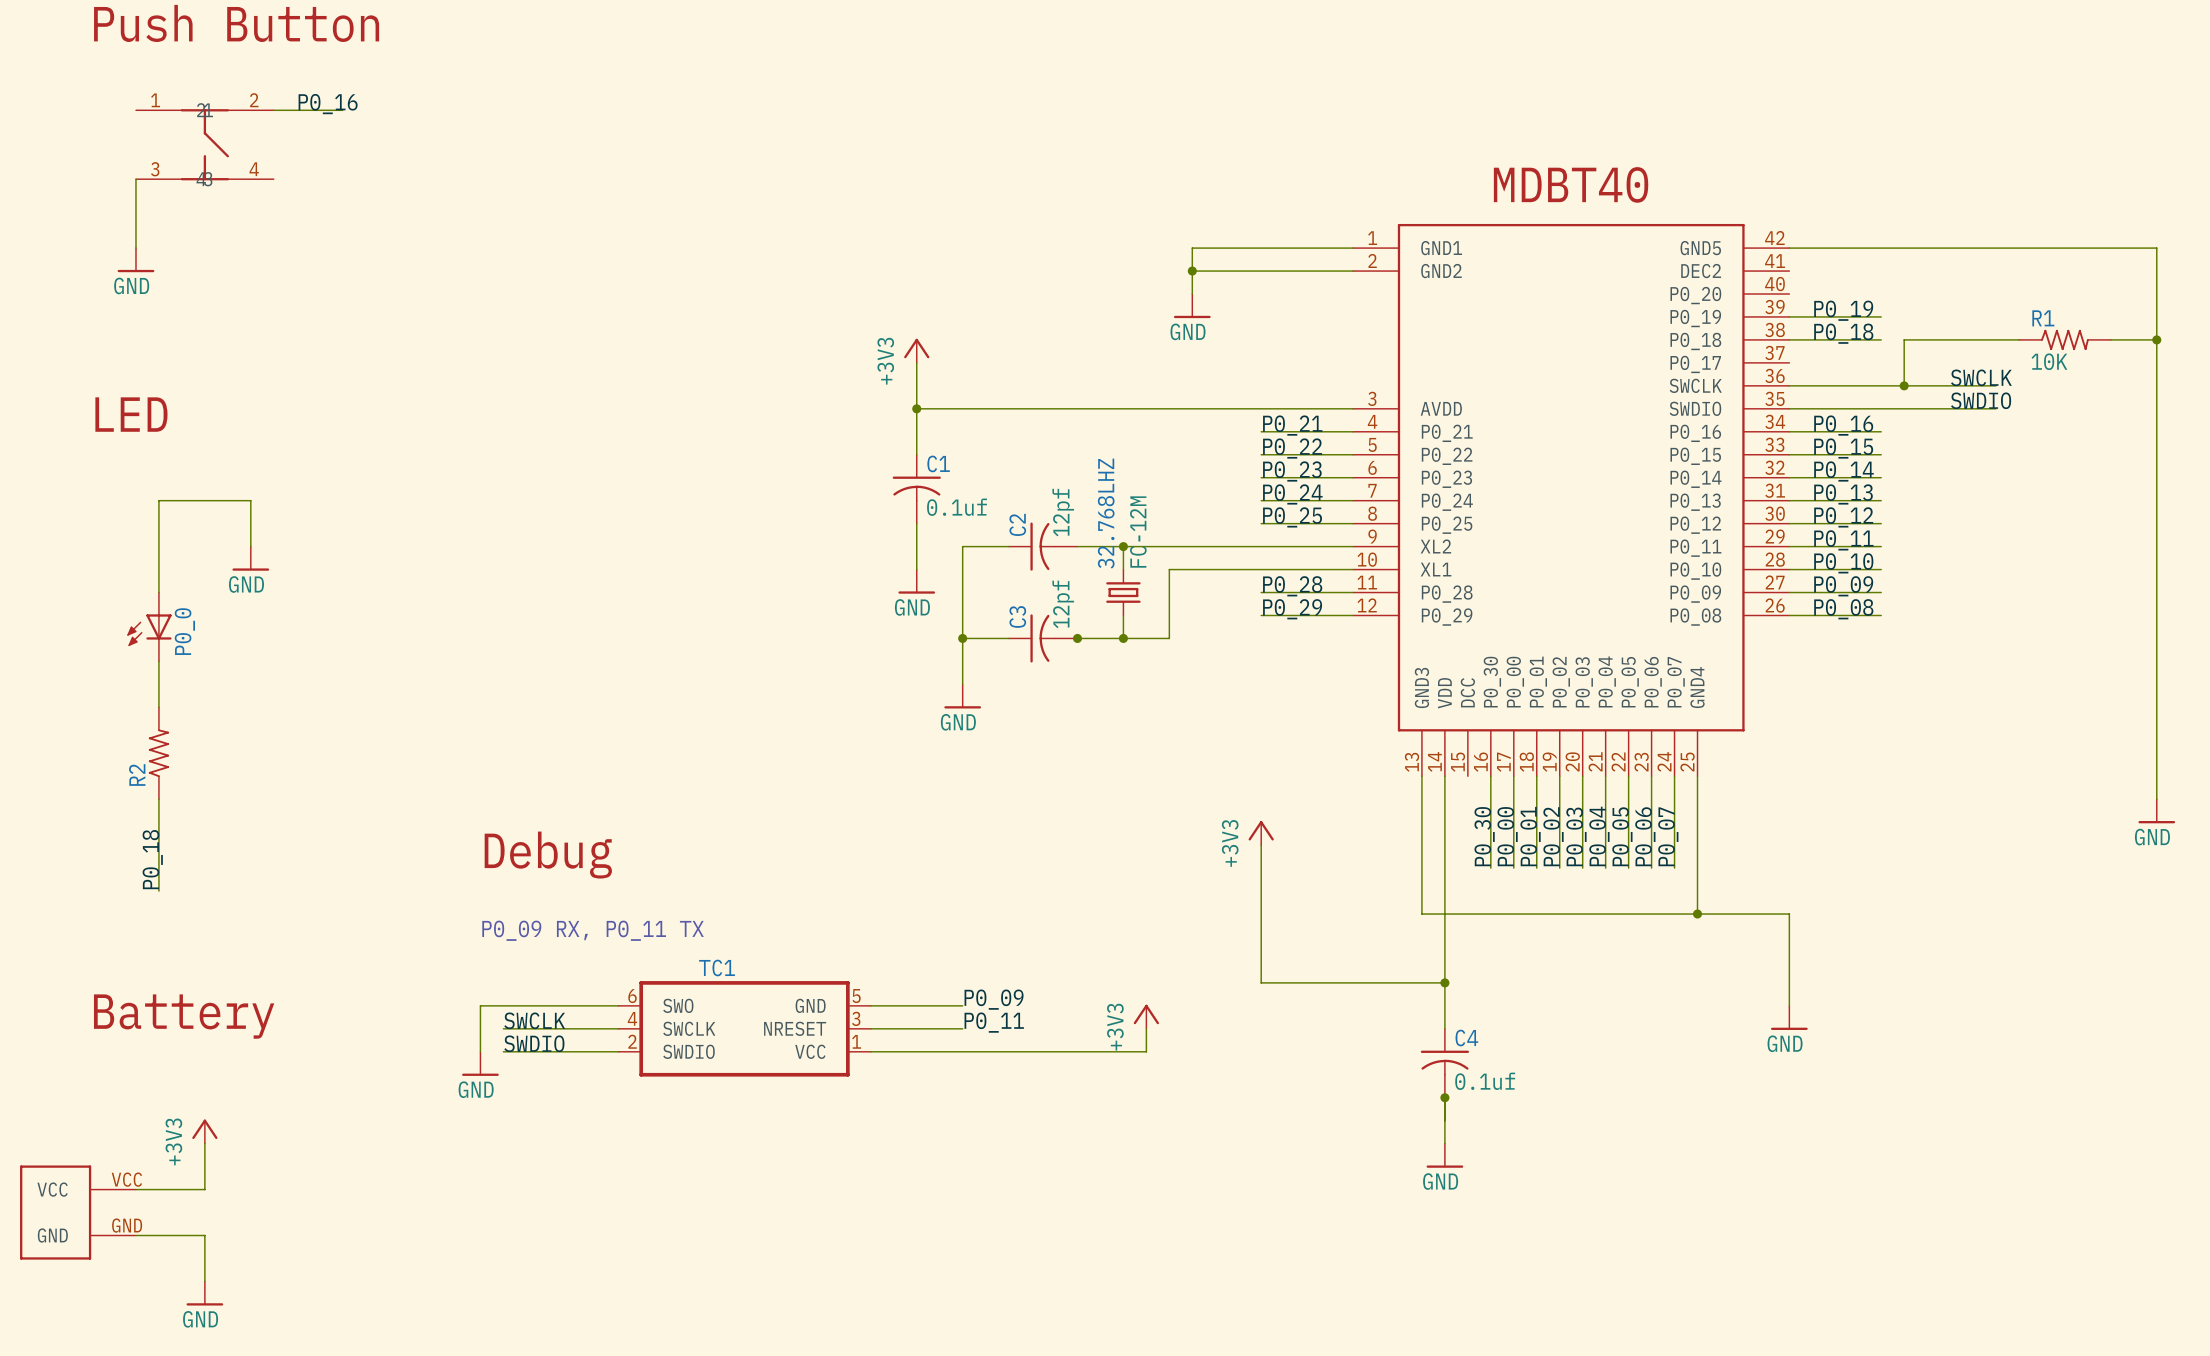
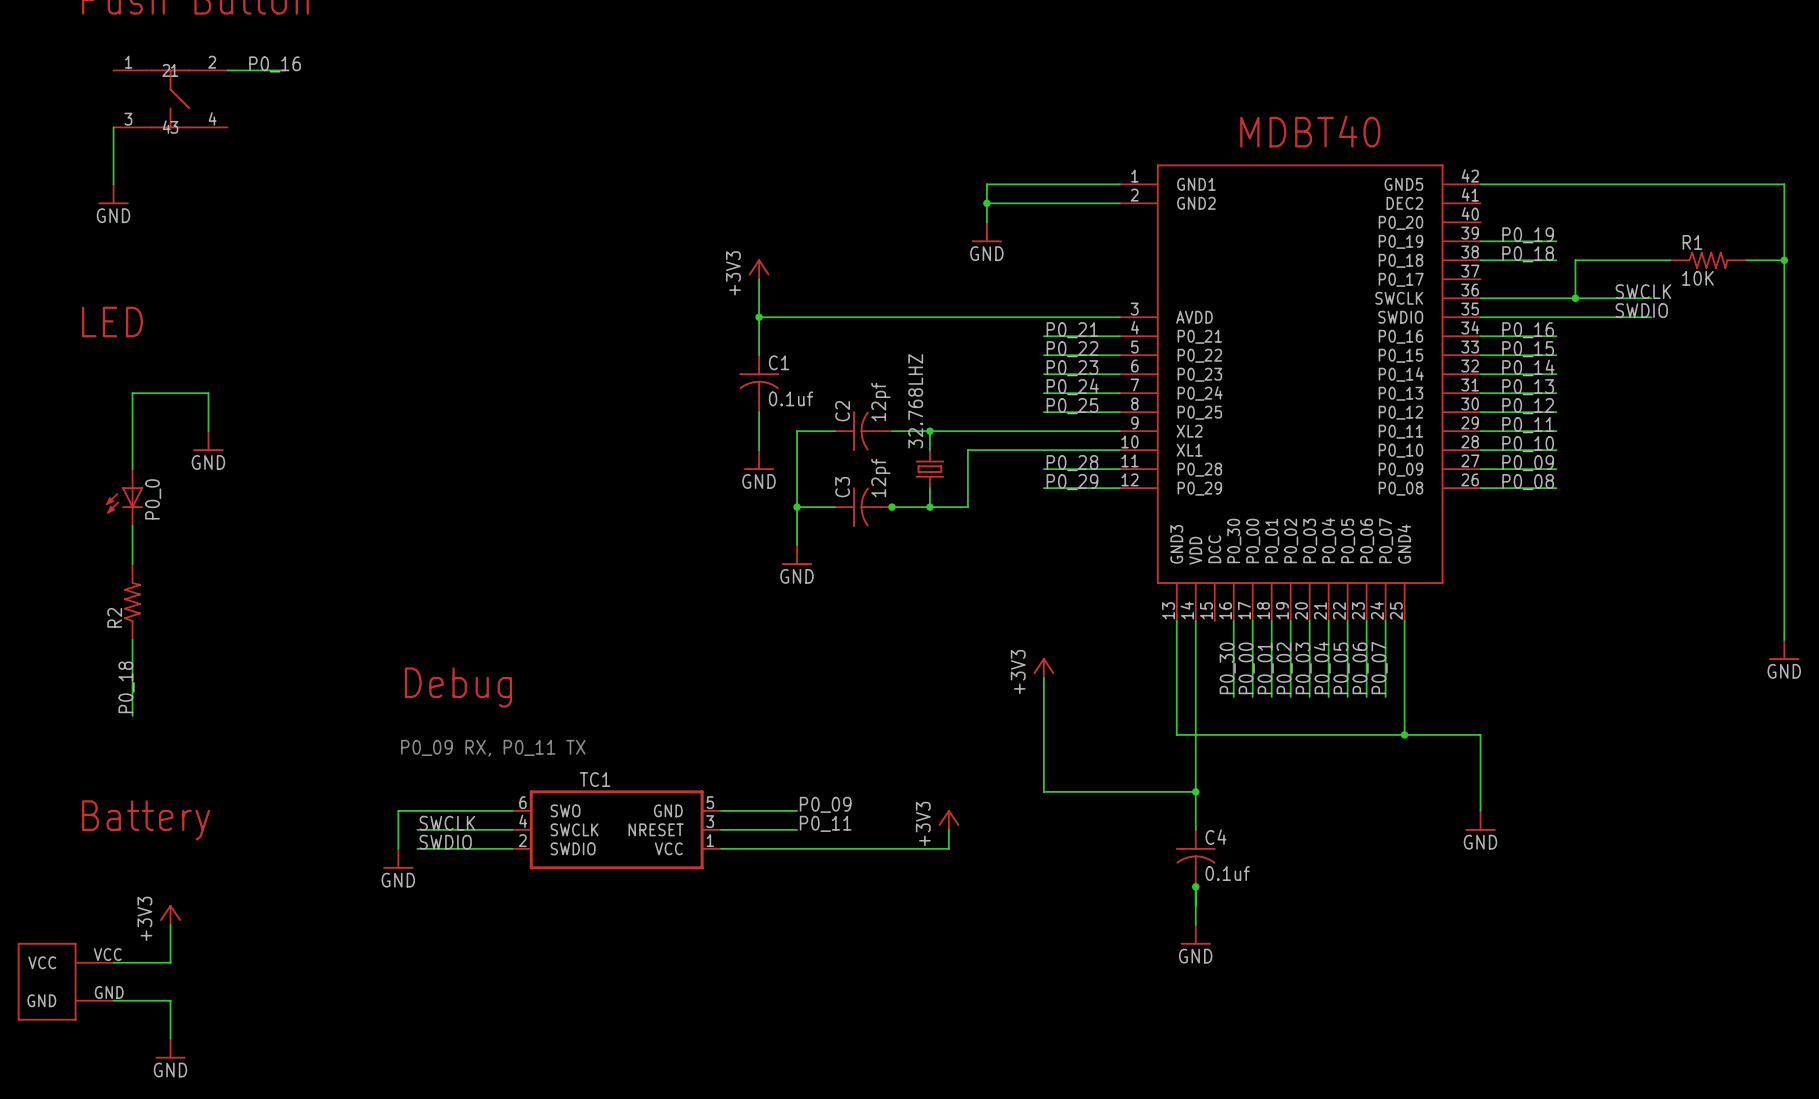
32.768LHZ value: FC-12M (1138, 532) -> none

